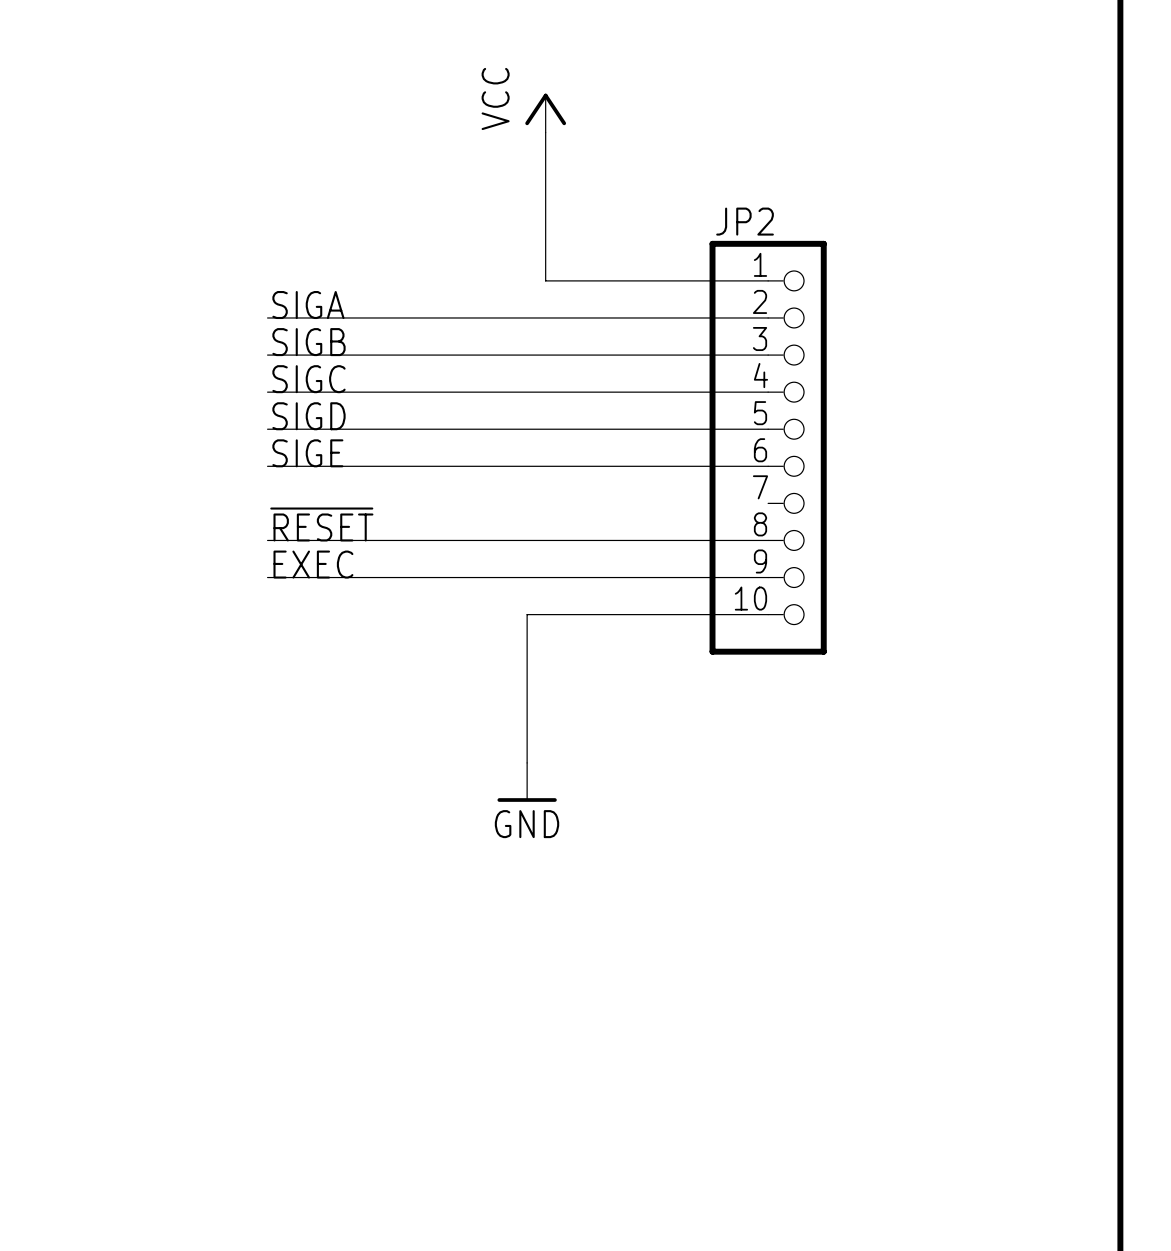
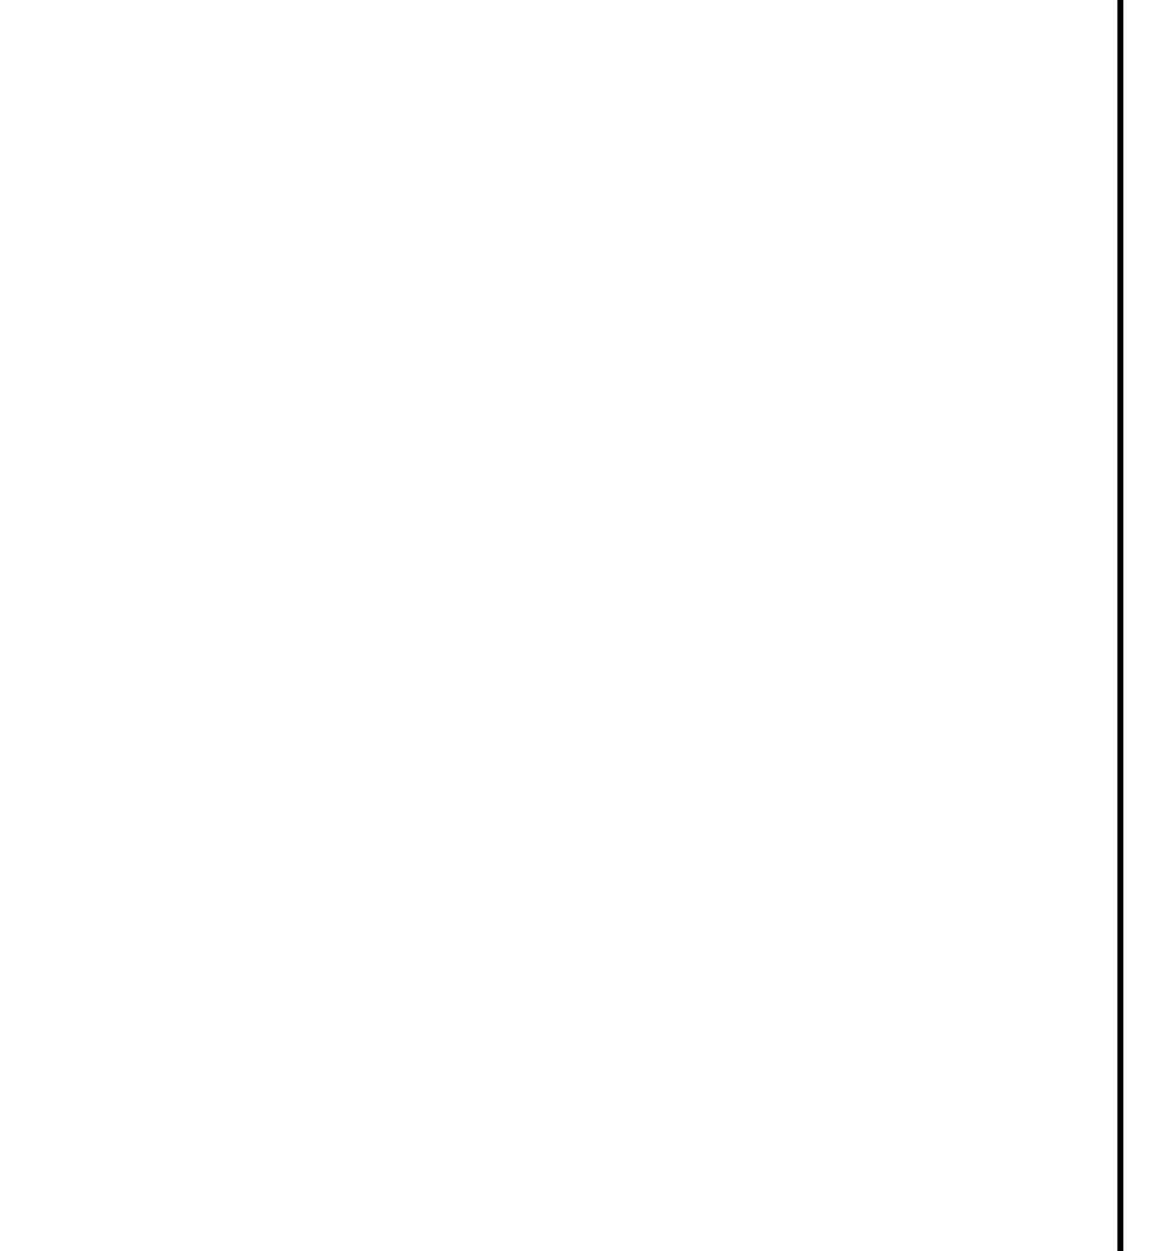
power symbol: VCC (545, 113) -> none
wire: (545, 132) (545, 280) (768, 280) -> none
label: SIGA (308, 305) -> none
wire: (267, 317) (768, 317) -> none
label: SIGB (308, 342) -> none
wire: (267, 355) (768, 355) -> none
label: SIGC (308, 379) -> none
wire: (267, 392) (768, 392) -> none
label: SIGD (308, 416) -> none
wire: (267, 429) (768, 429) -> none
JP2: (768, 447) -> none
label: SIGE (307, 453) -> none
wire: (267, 466) (768, 466) -> none
label: ~{RESET} (321, 524) -> none
wire: (267, 540) (768, 540) -> none
label: EXEC (313, 564) -> none
wire: (267, 577) (768, 577) -> none
wire: (768, 614) (527, 614) (527, 762) -> none
power symbol: GND (527, 782) -> none

